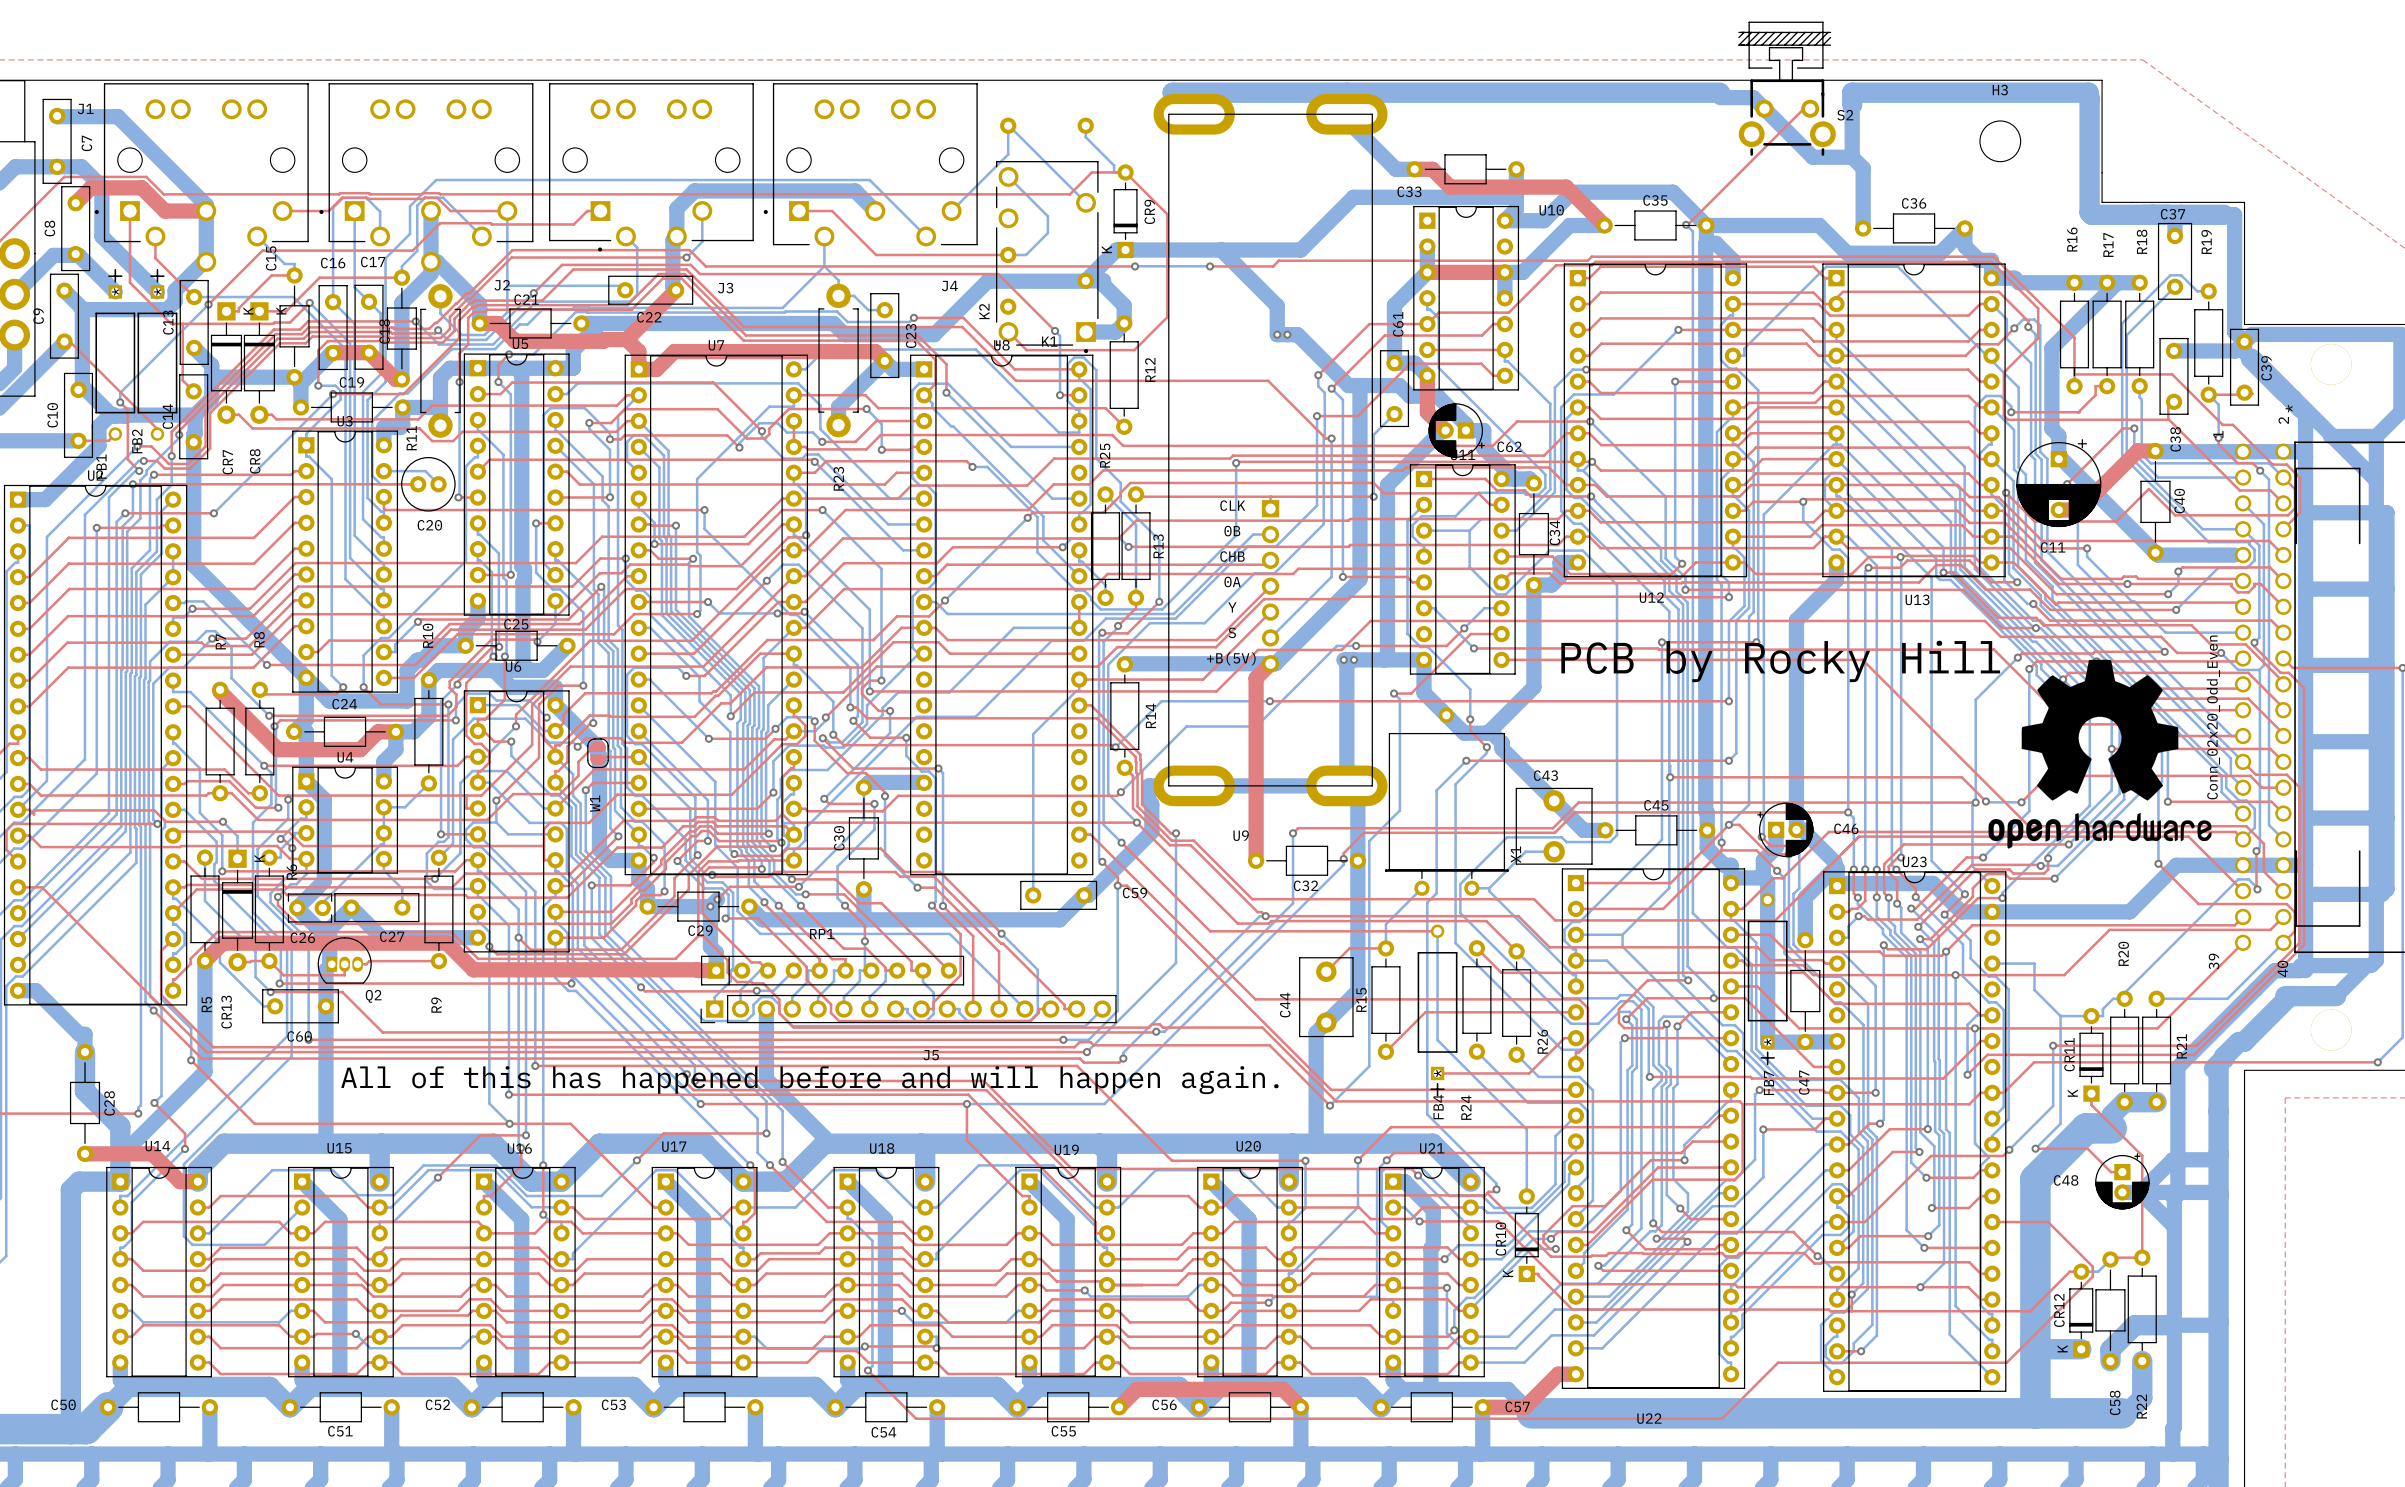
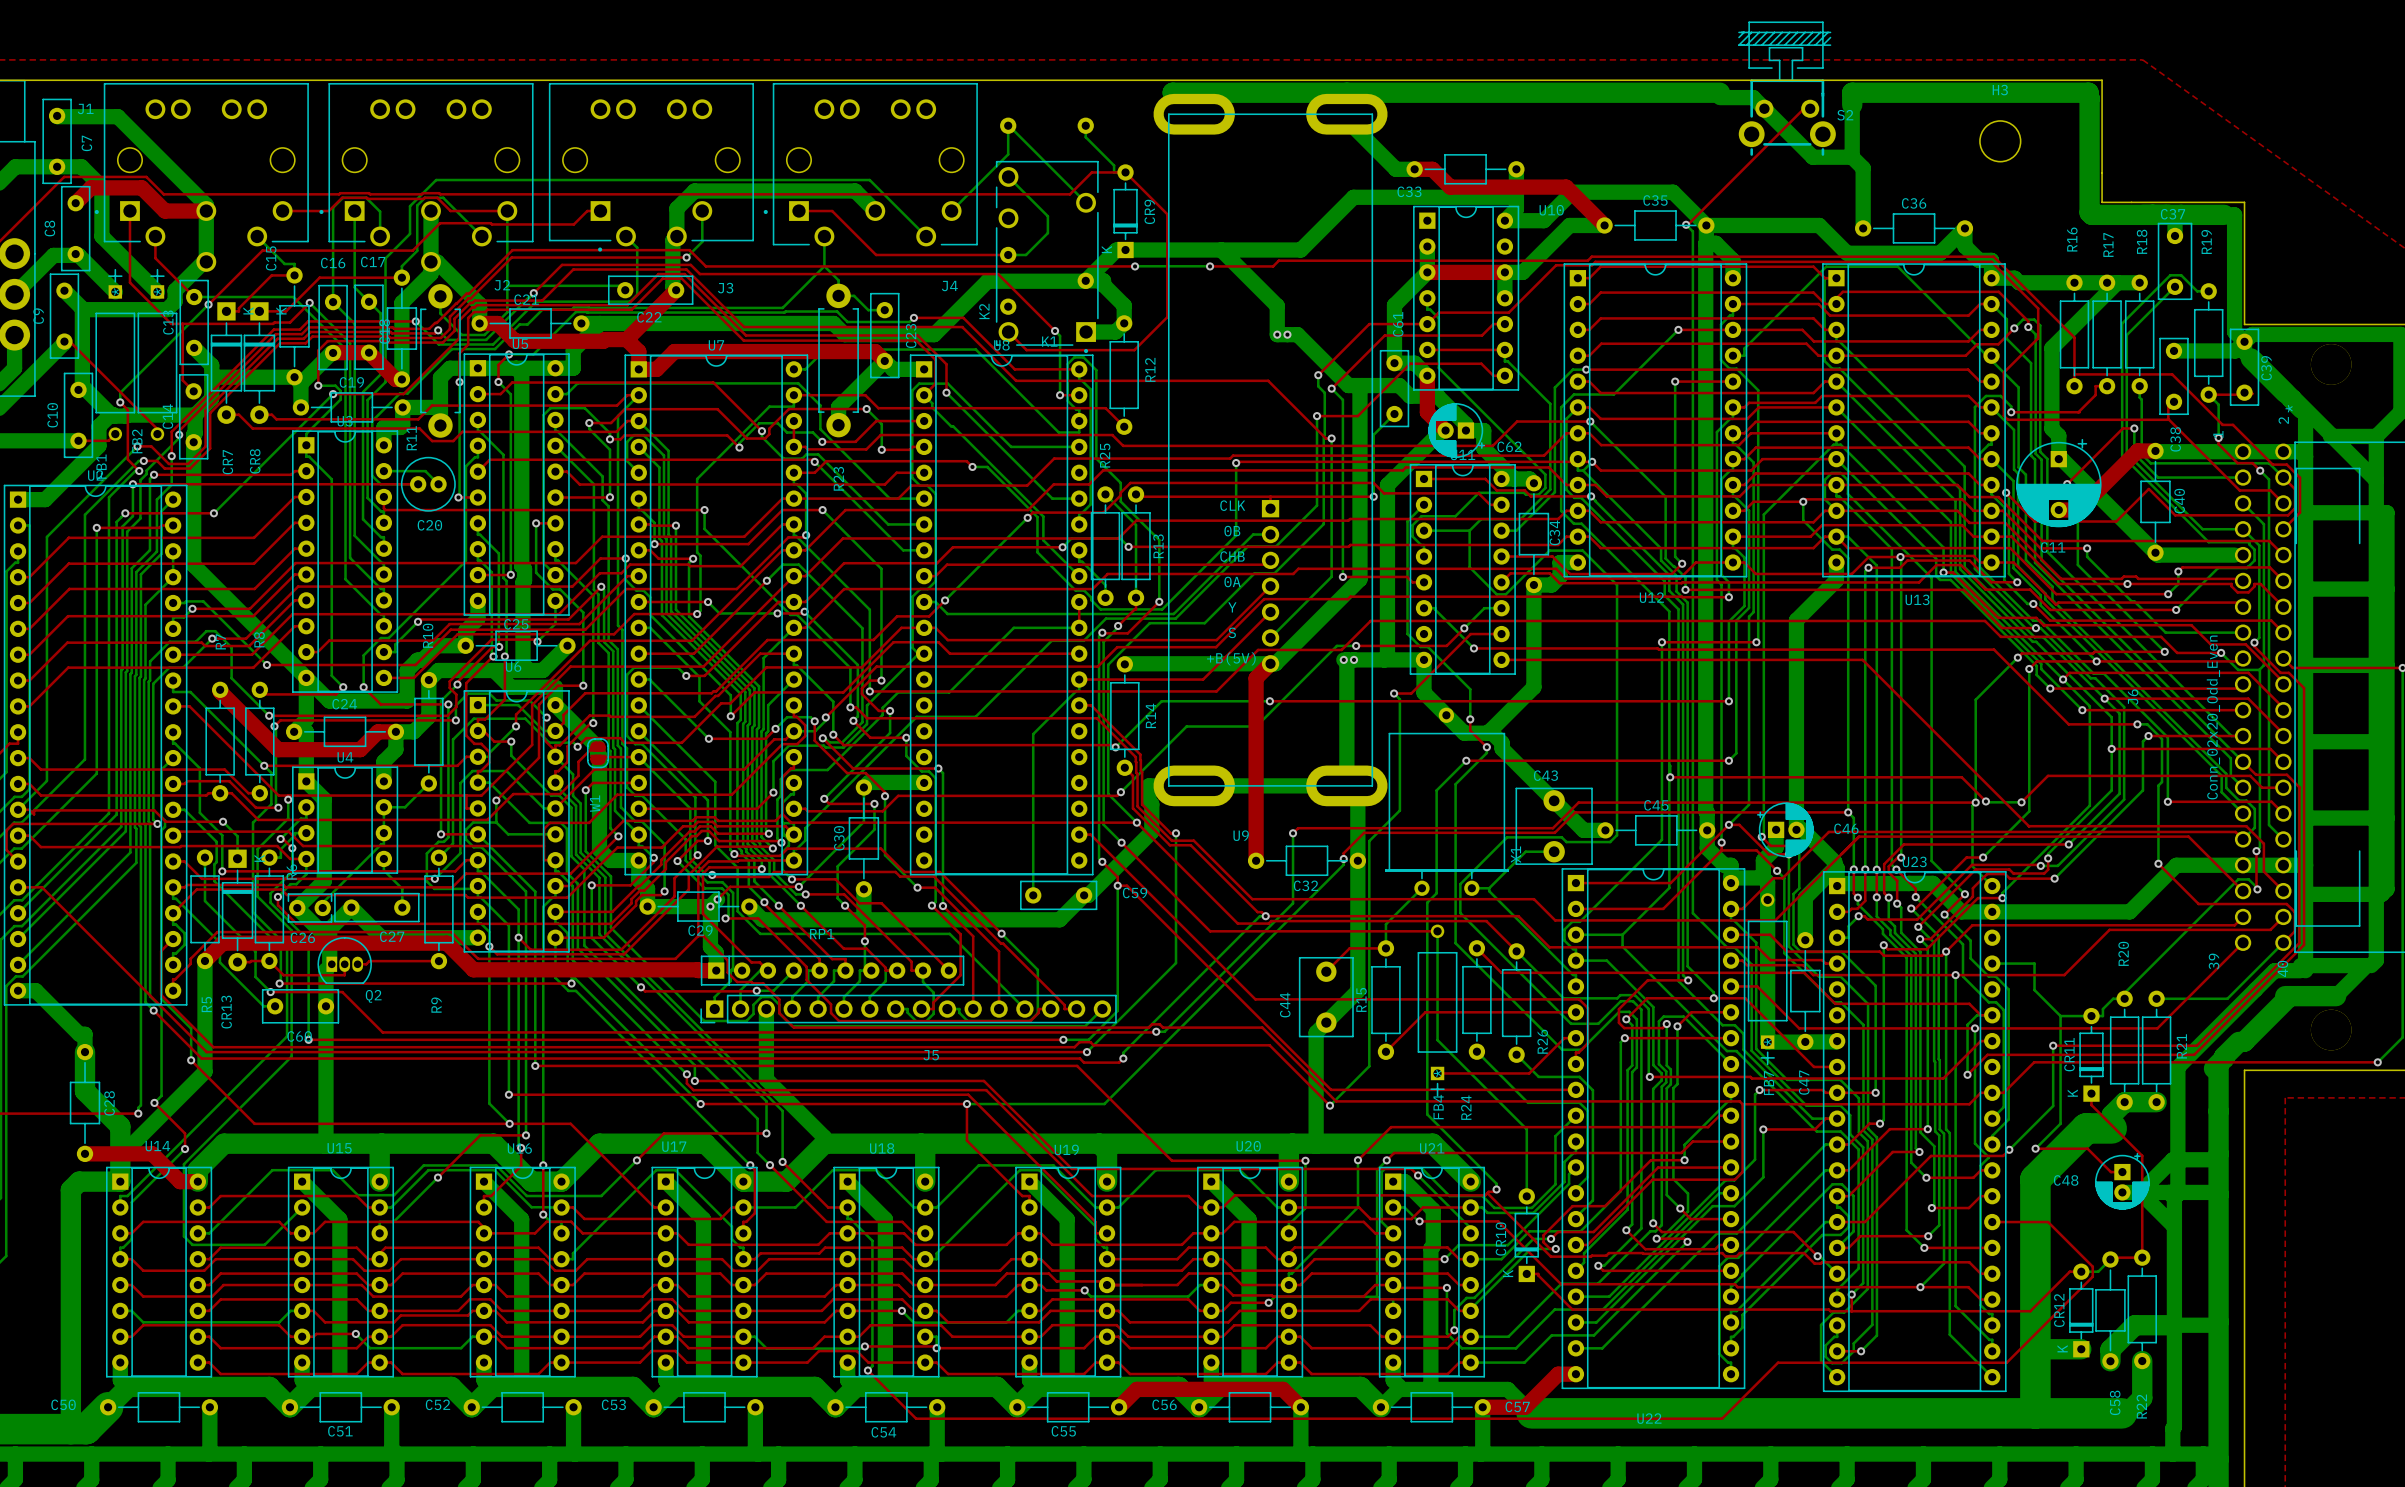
drawing: [1988, 659, 2212, 849] -> none
text: PCB by Rocky Hill (1780, 661) -> none
text: All of this has happened before and will happen again. (809, 1080) -> none

